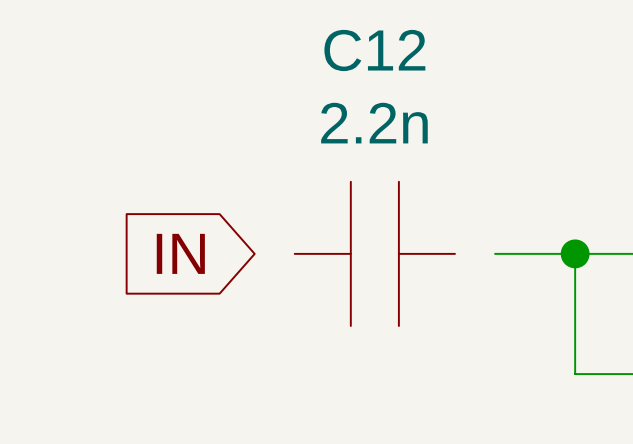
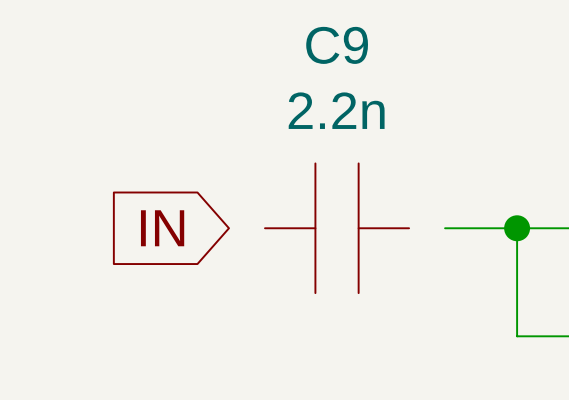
C12 name: C12 (374, 50) -> C9 (337, 45)

